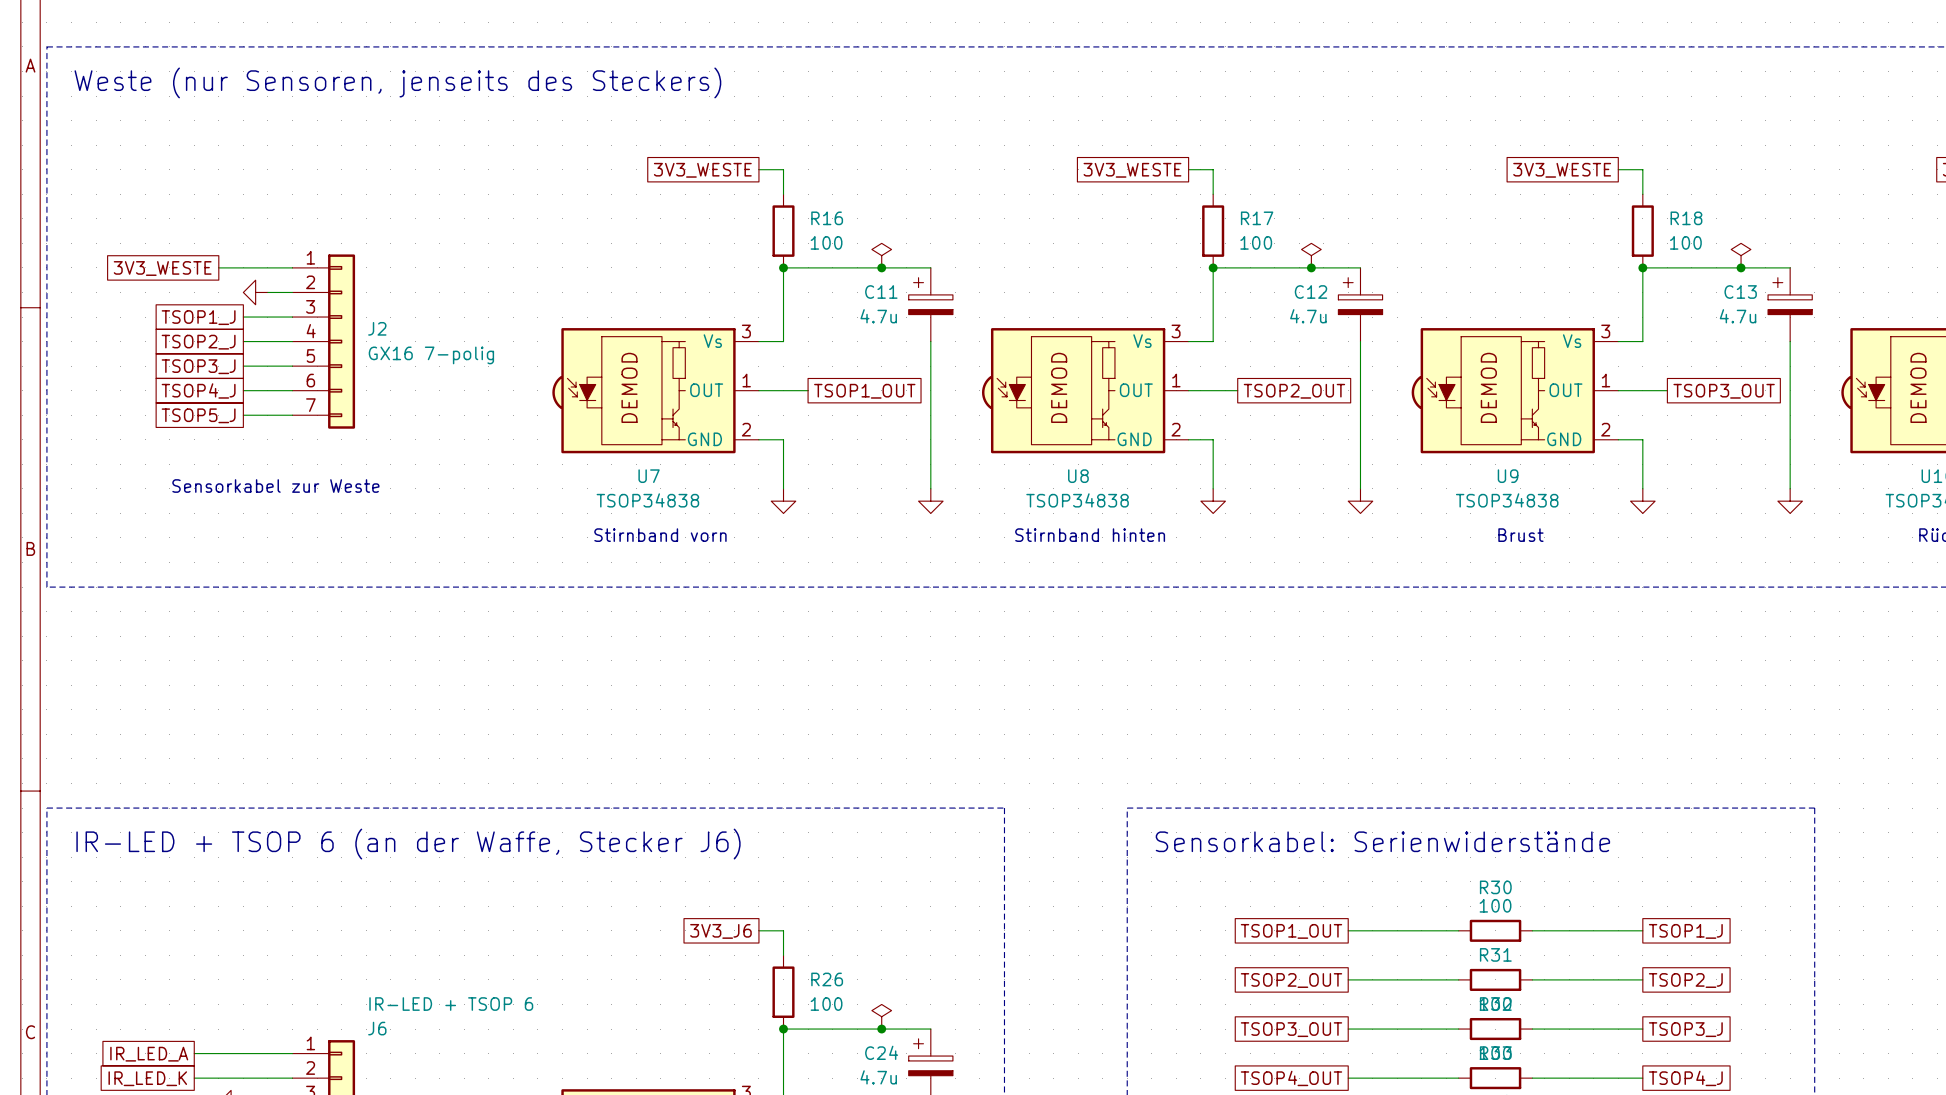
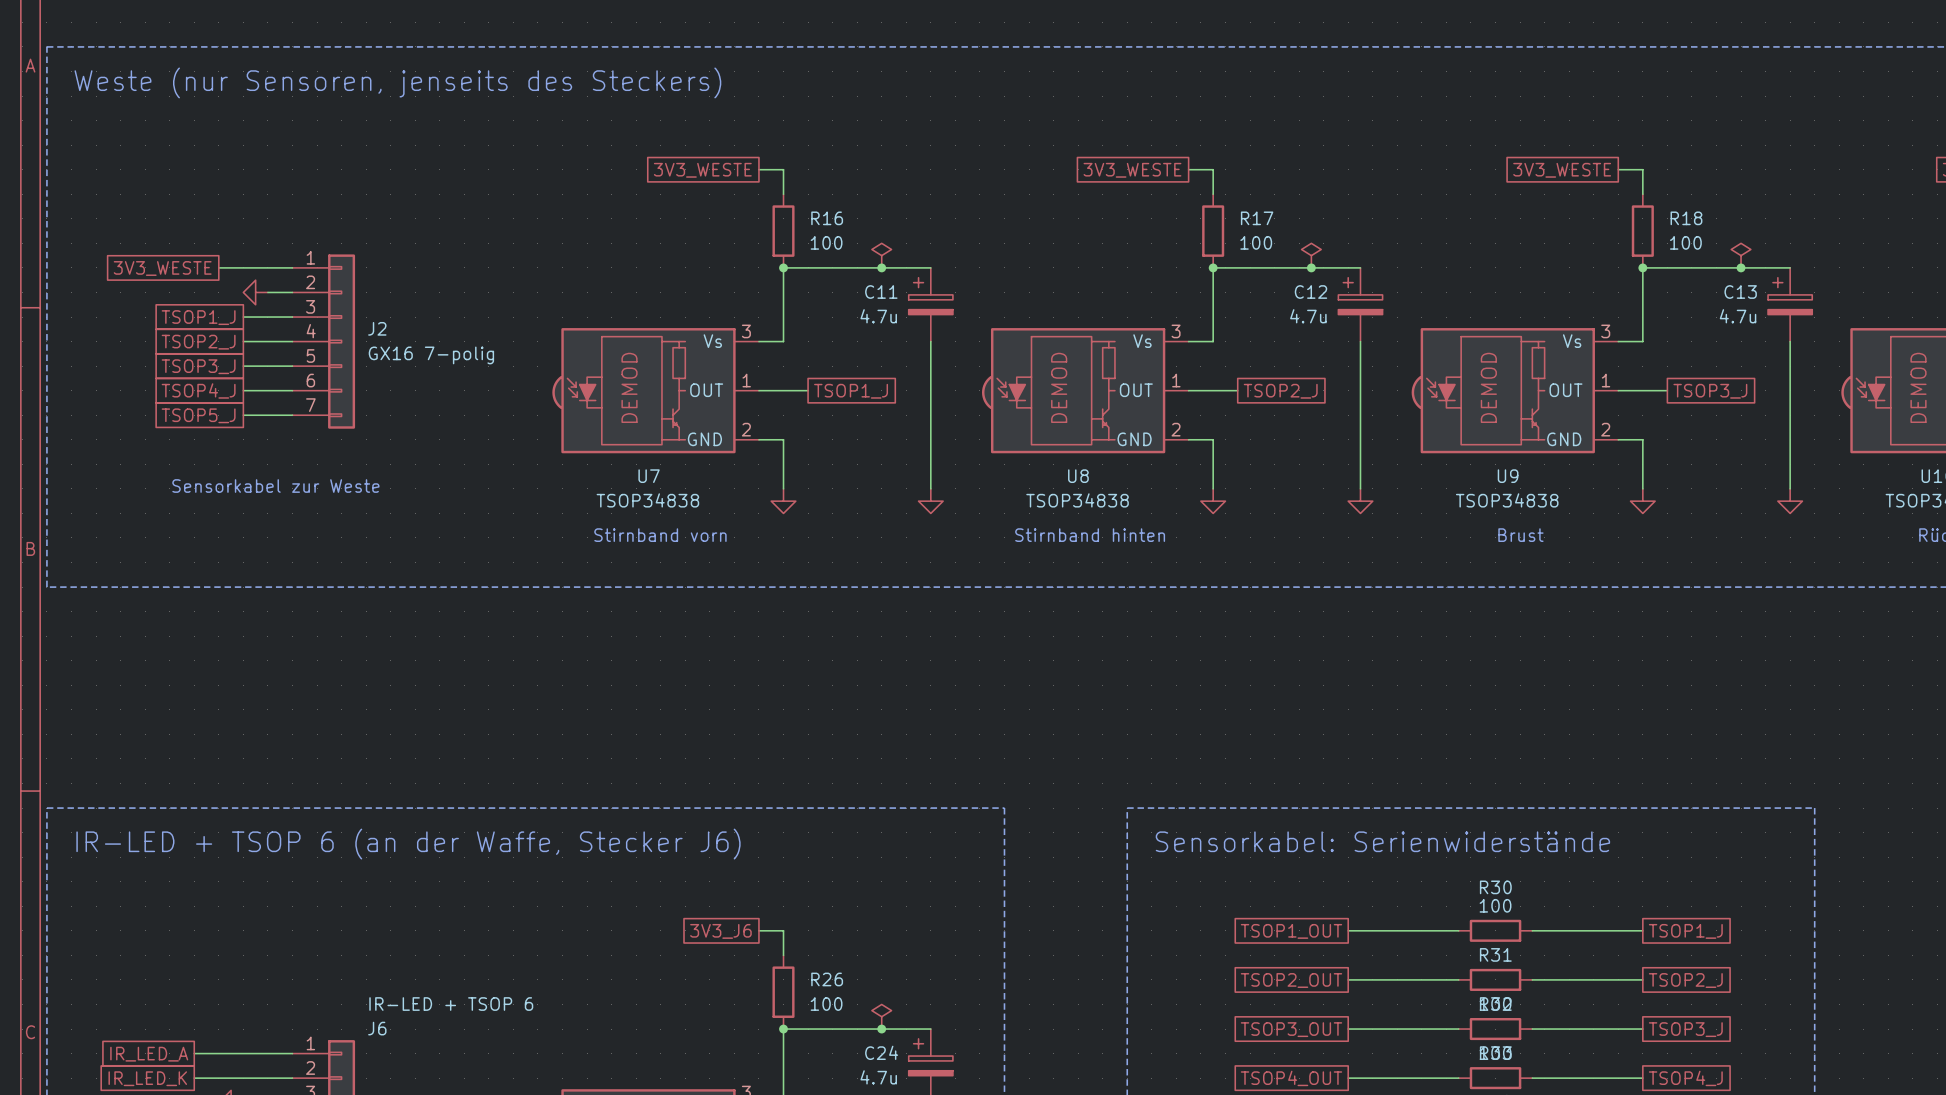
global label: TSOP1_OUT (864, 391) -> TSOP1_J (851, 391)
global label: TSOP2_OUT (1294, 391) -> TSOP2_J (1280, 391)
global label: TSOP3_OUT (1724, 391) -> TSOP3_J (1710, 391)

